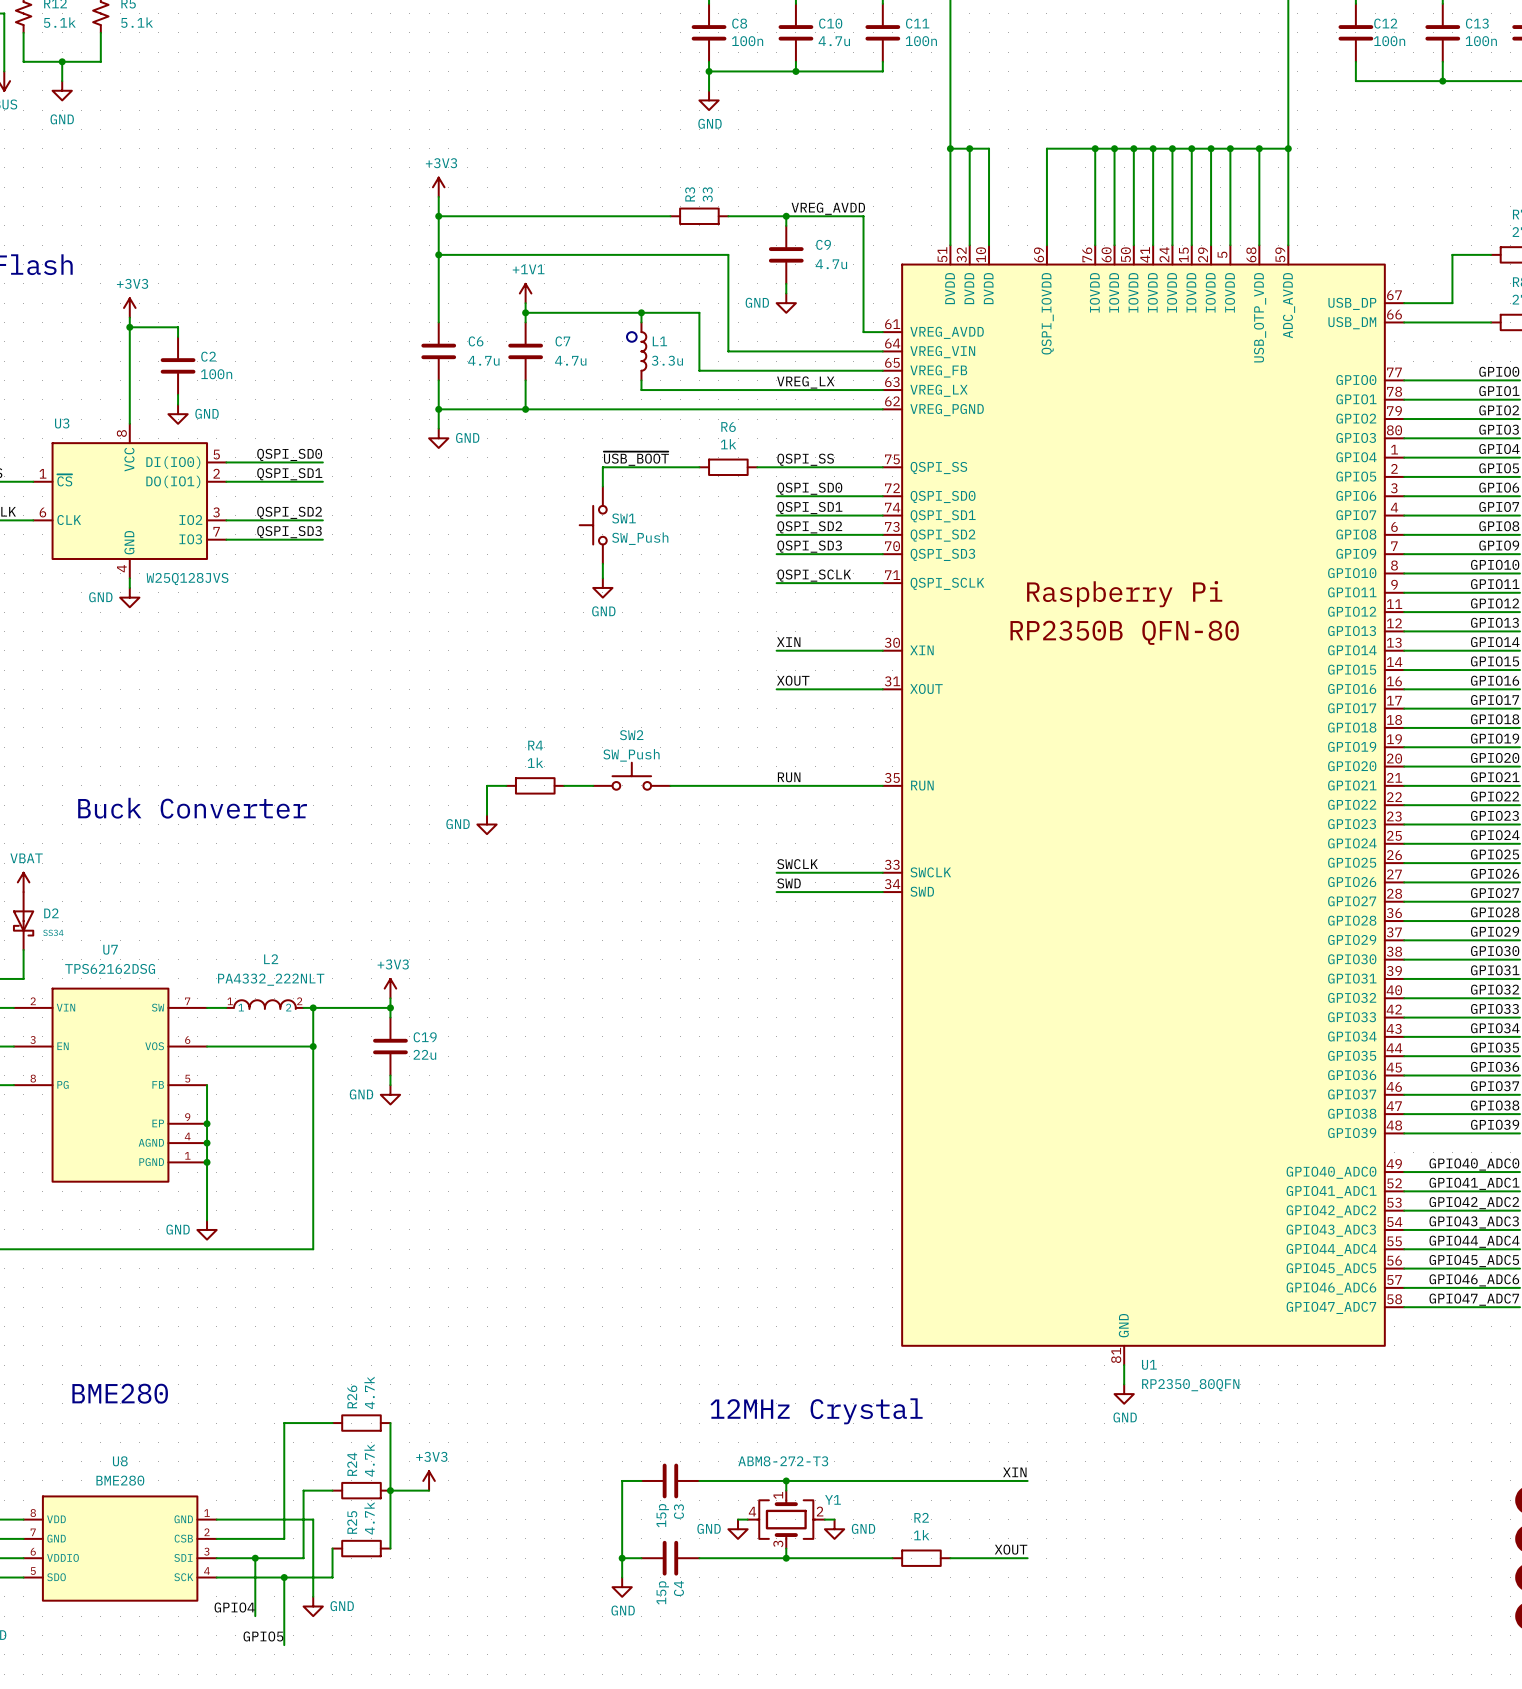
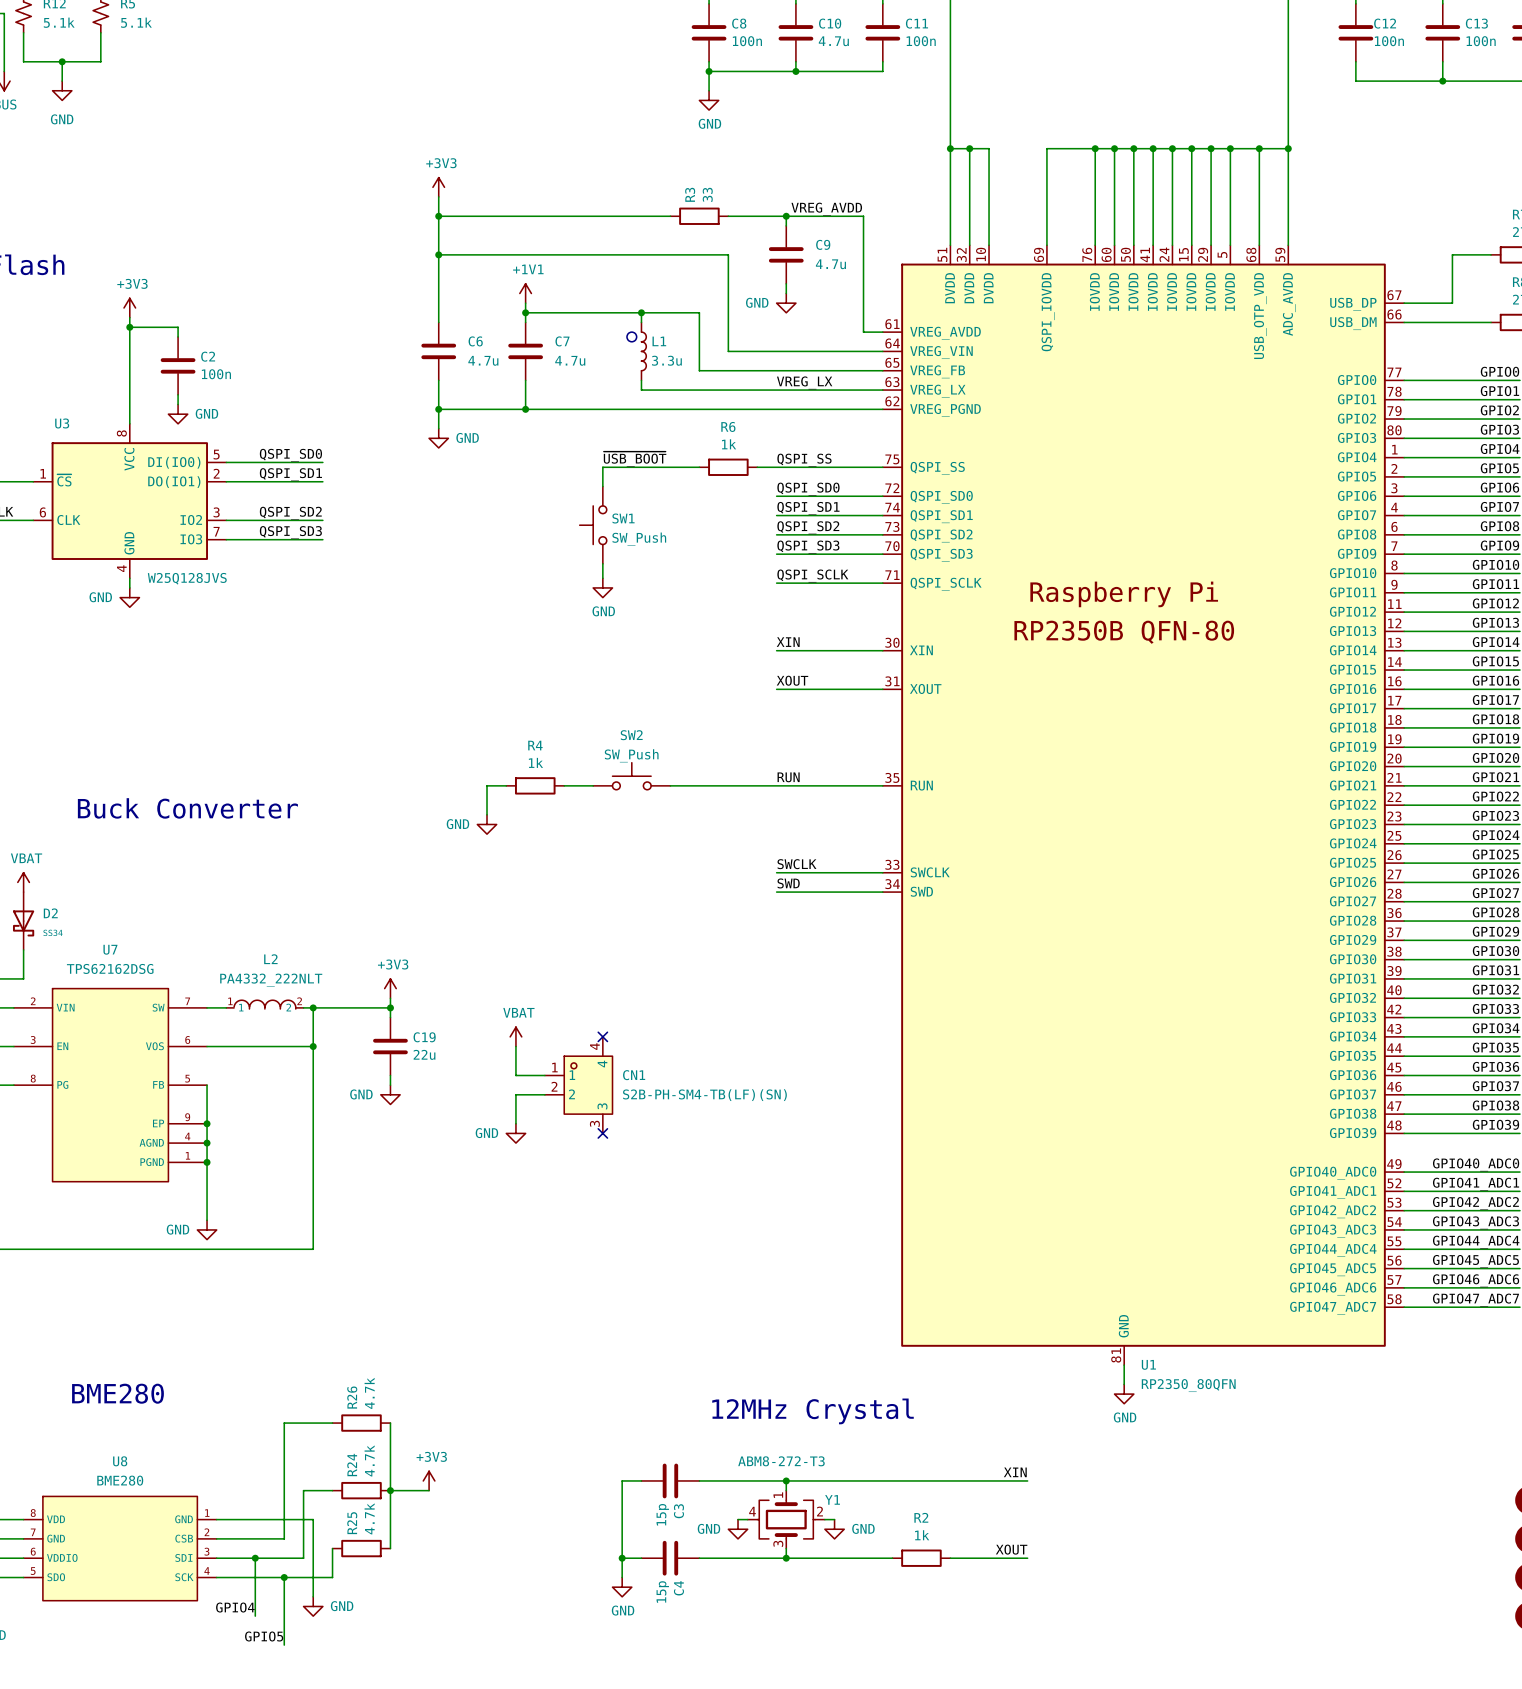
power symbol: none -> VBAT (515, 1036)
no-connect mark: none -> (602, 1036)
wire: none -> (515, 1046) (515, 1075) (544, 1075)
CN1: none -> S2B-PH-SM4-TB(LF)(SN) (578, 1085)
wire: none -> (544, 1094) (515, 1094) (515, 1123)
power symbol: none -> GND (515, 1133)
no-connect mark: none -> (602, 1133)

